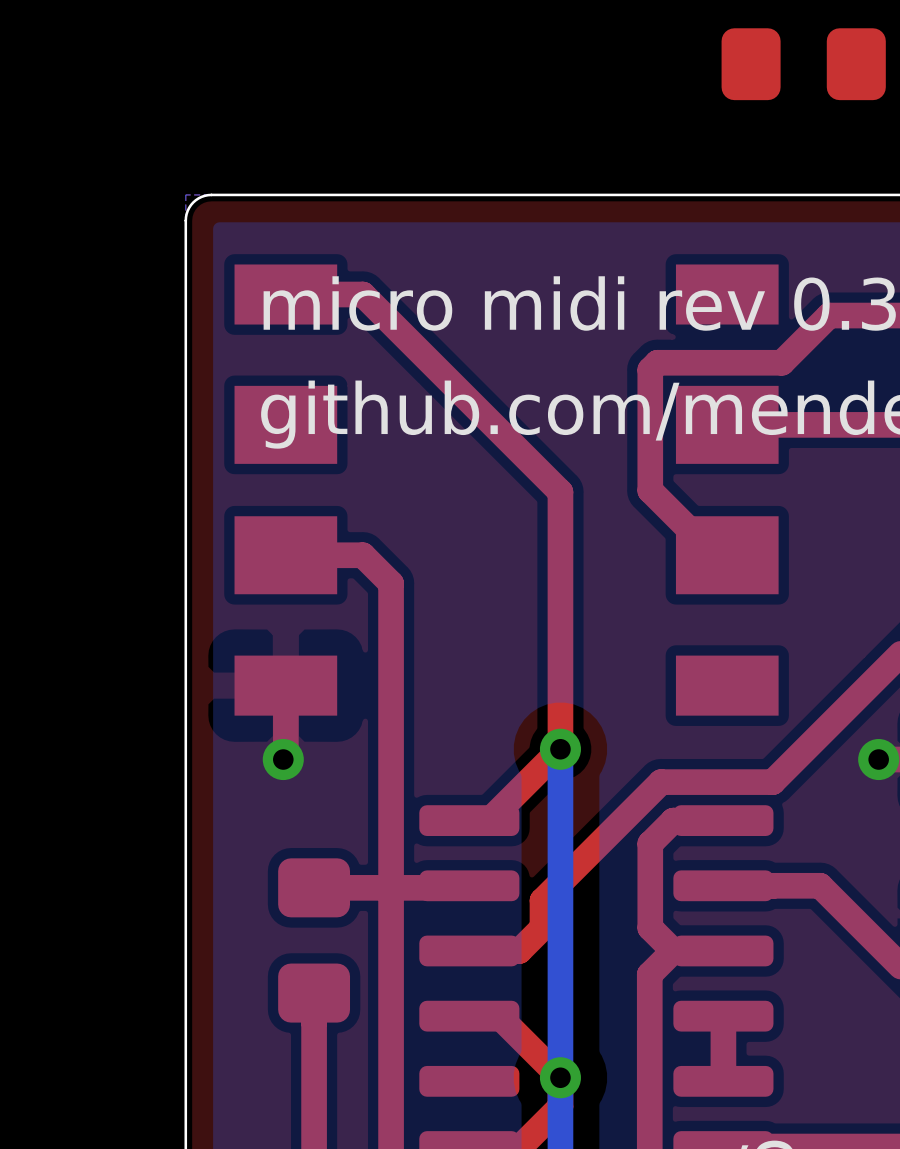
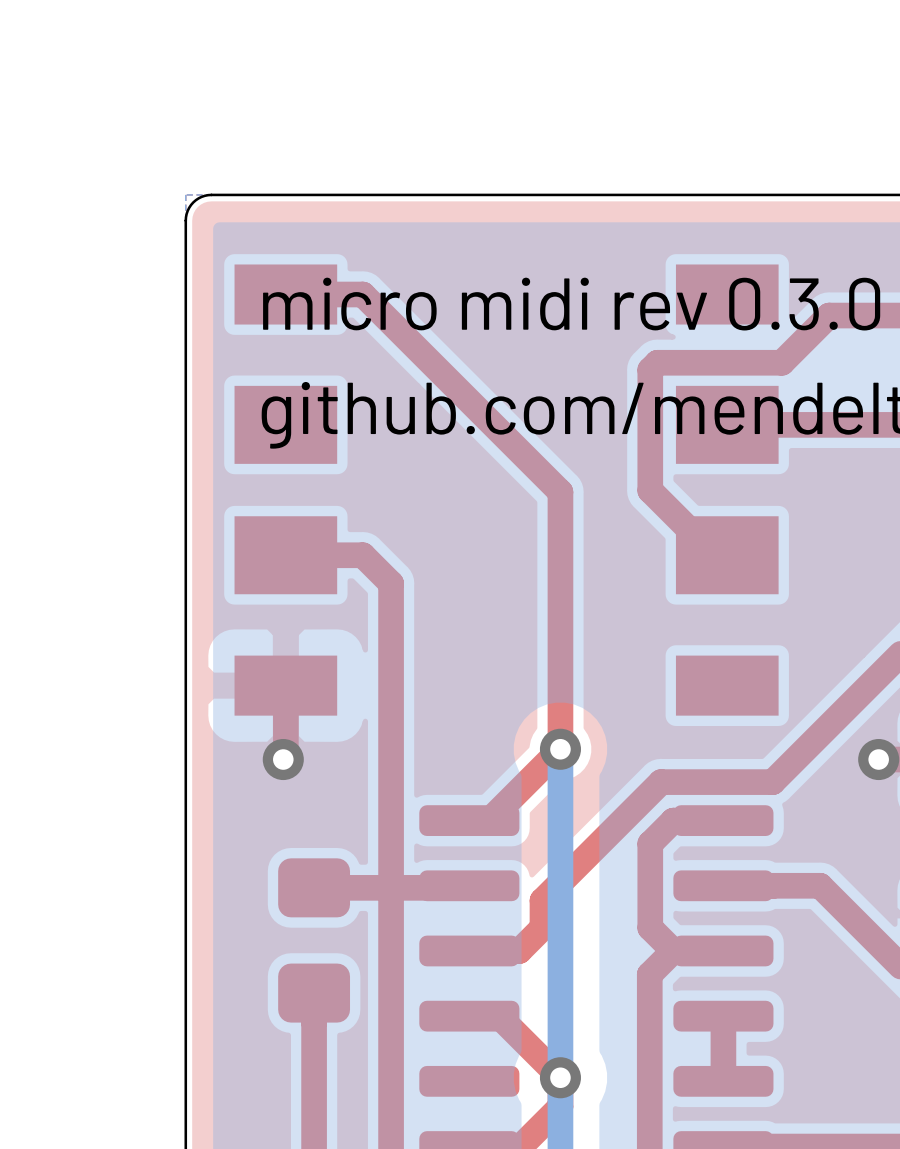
part: (803, 64) -> none

